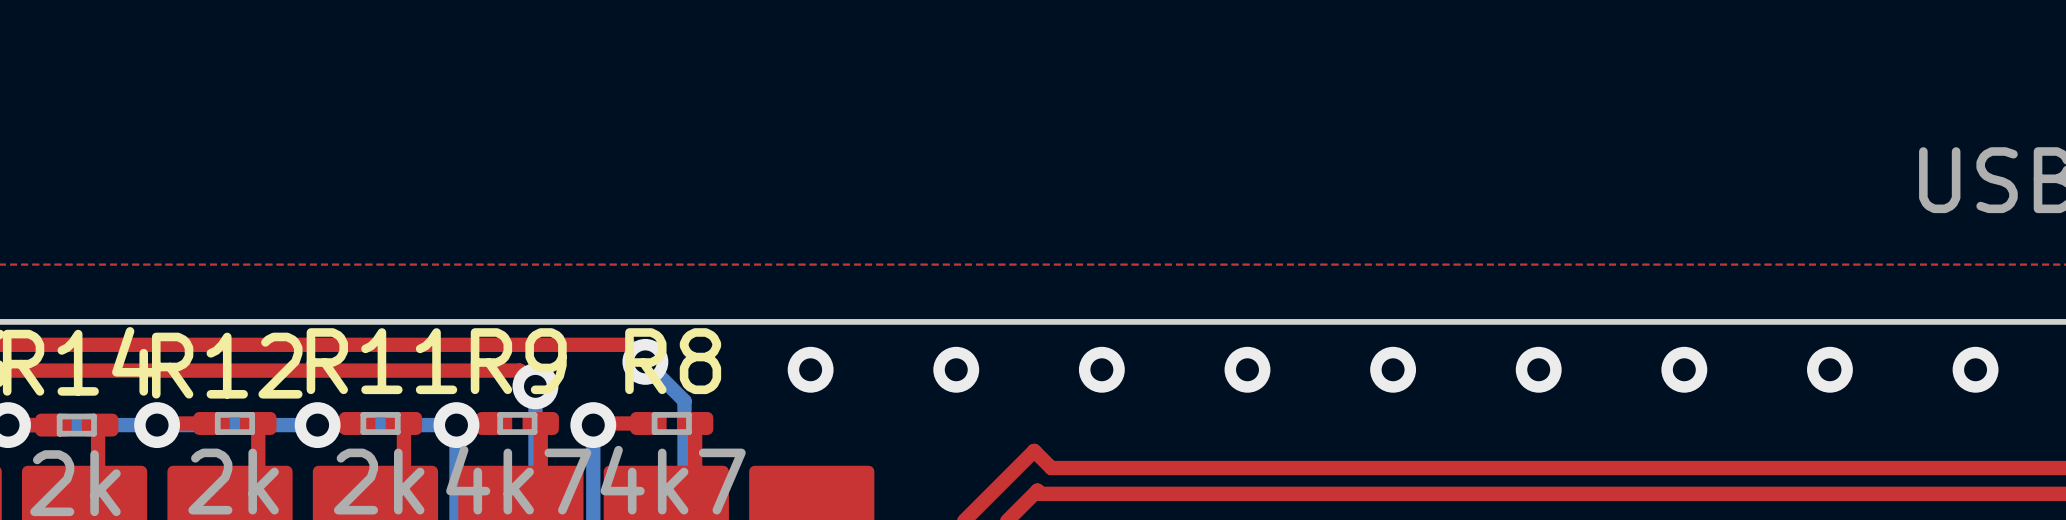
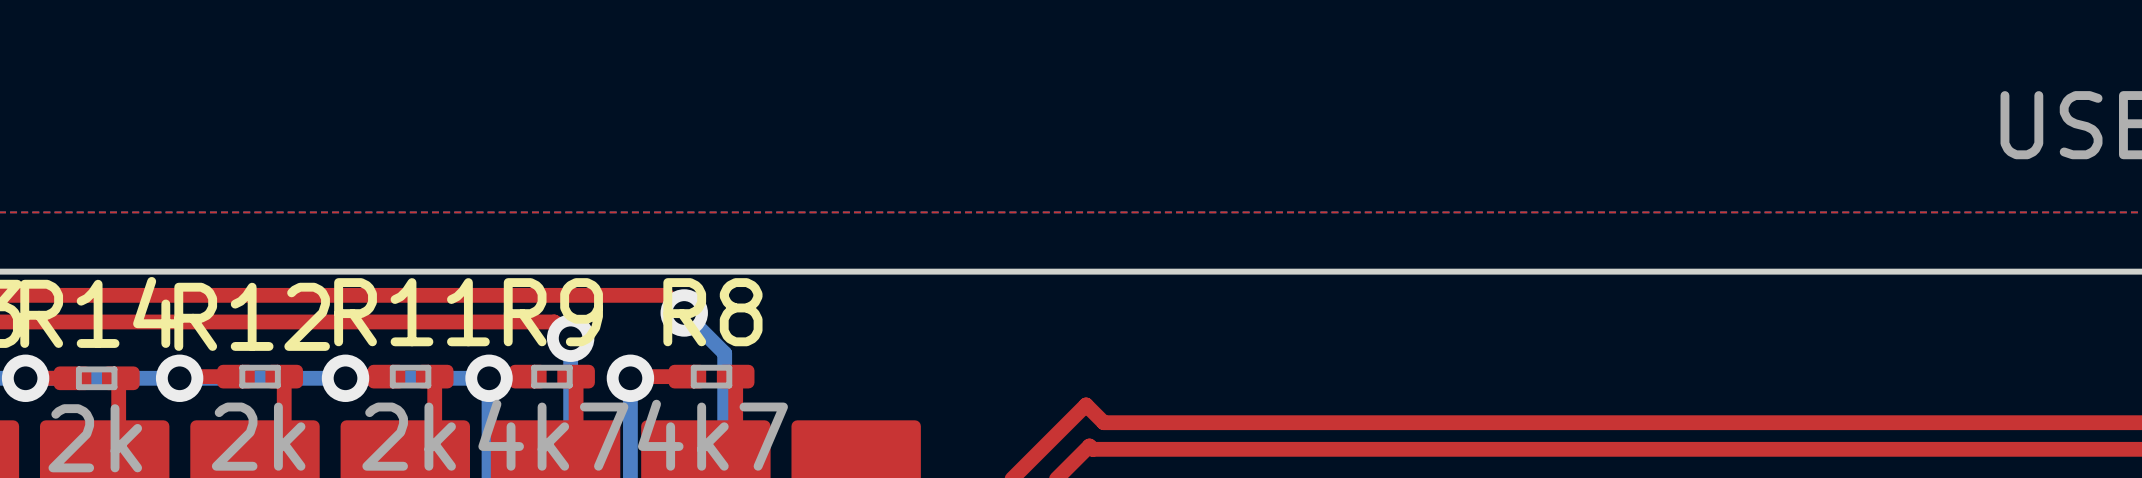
via: (810, 369) -> none
via: (956, 369) -> none
via: (1101, 369) -> none
via: (1247, 369) -> none
via: (1393, 369) -> none
via: (1538, 369) -> none
via: (1684, 369) -> none
via: (1829, 369) -> none
via: (1975, 369) -> none

